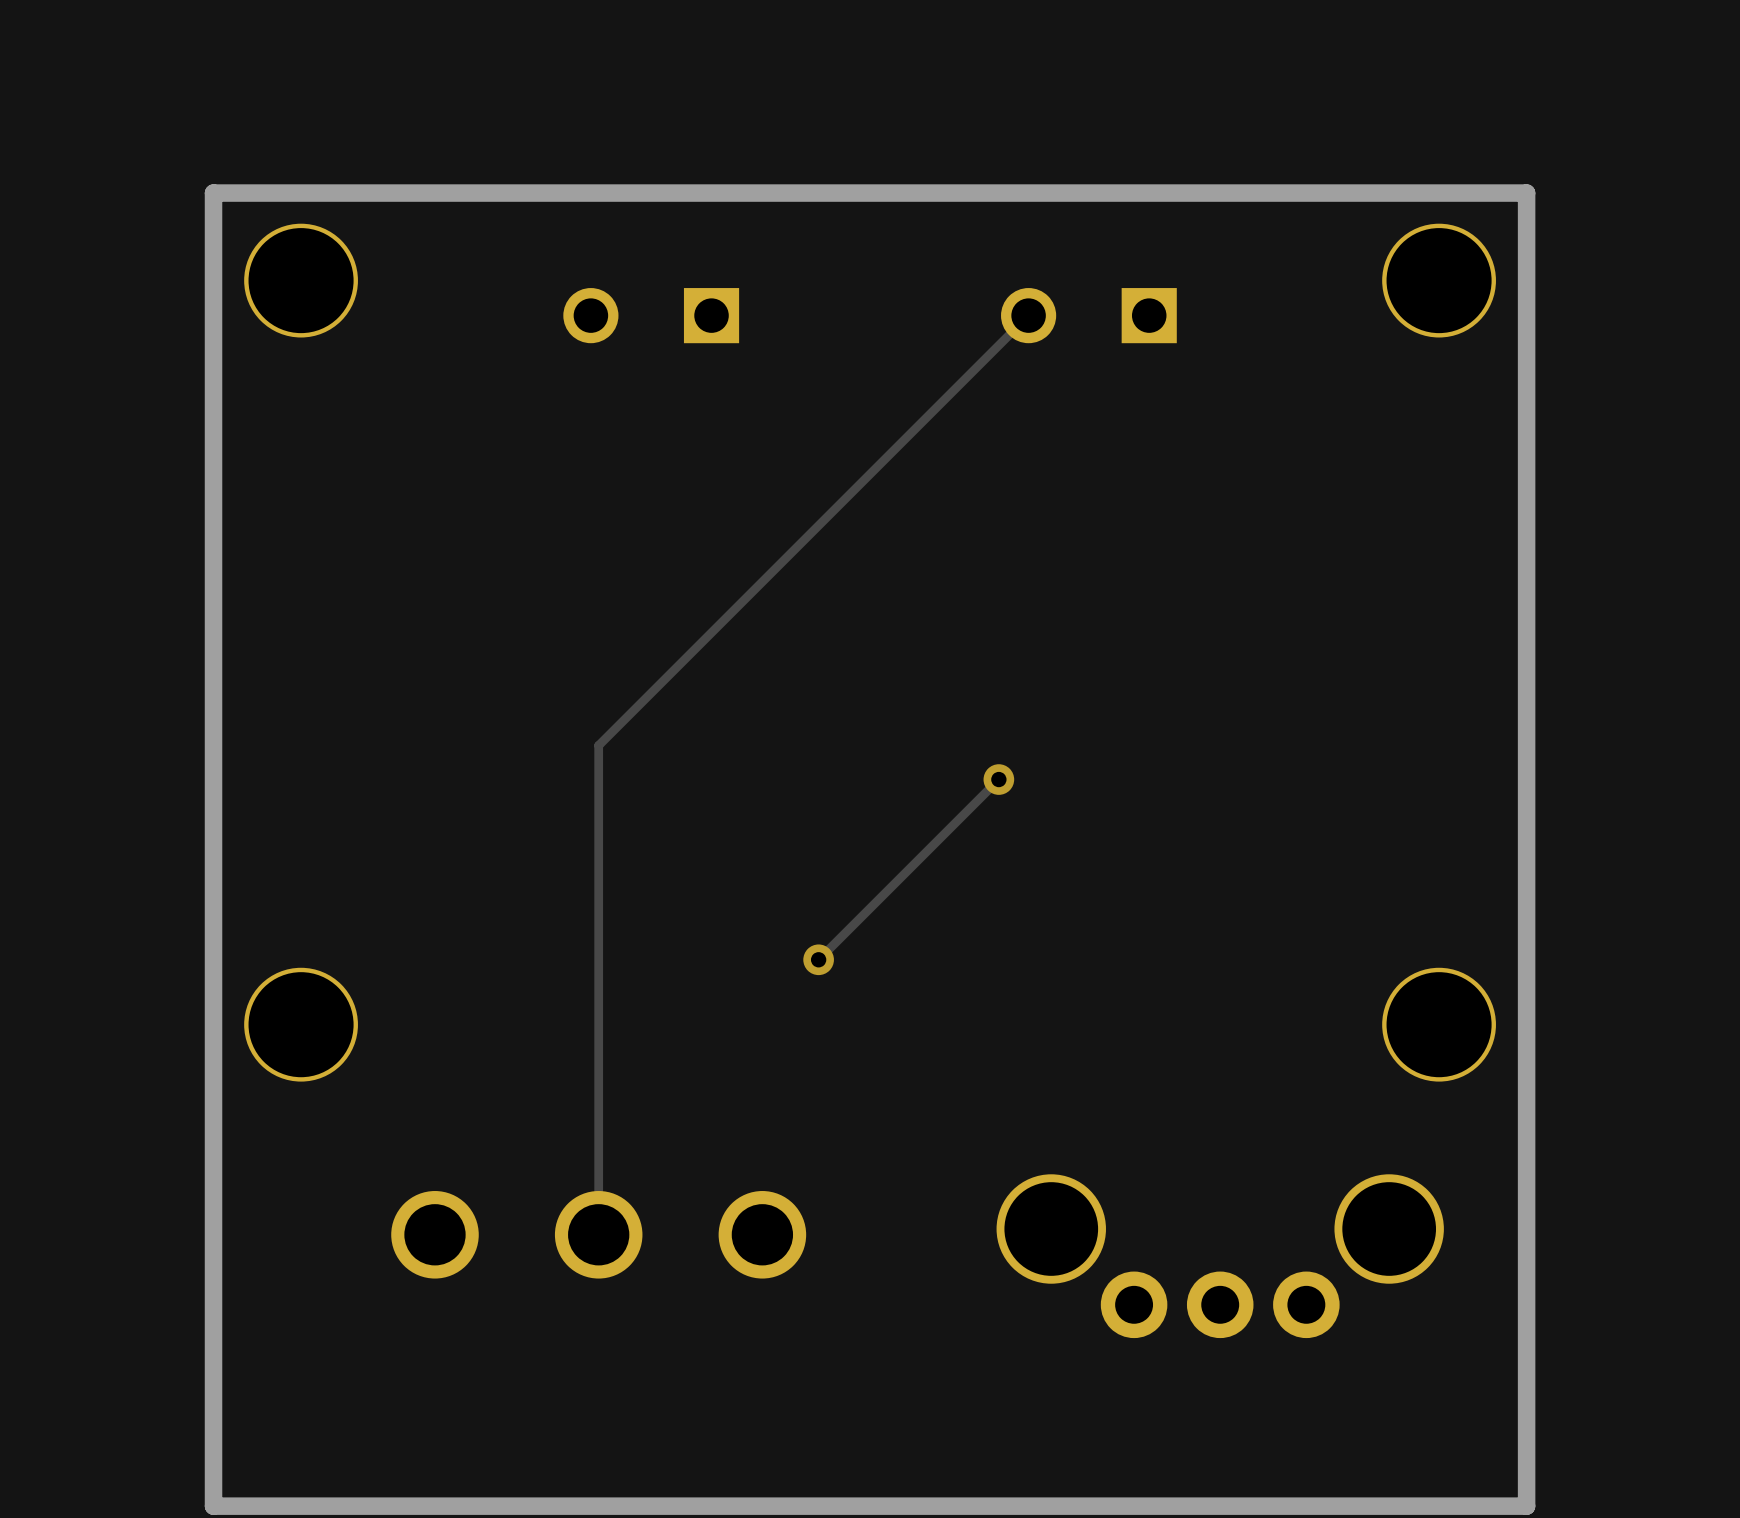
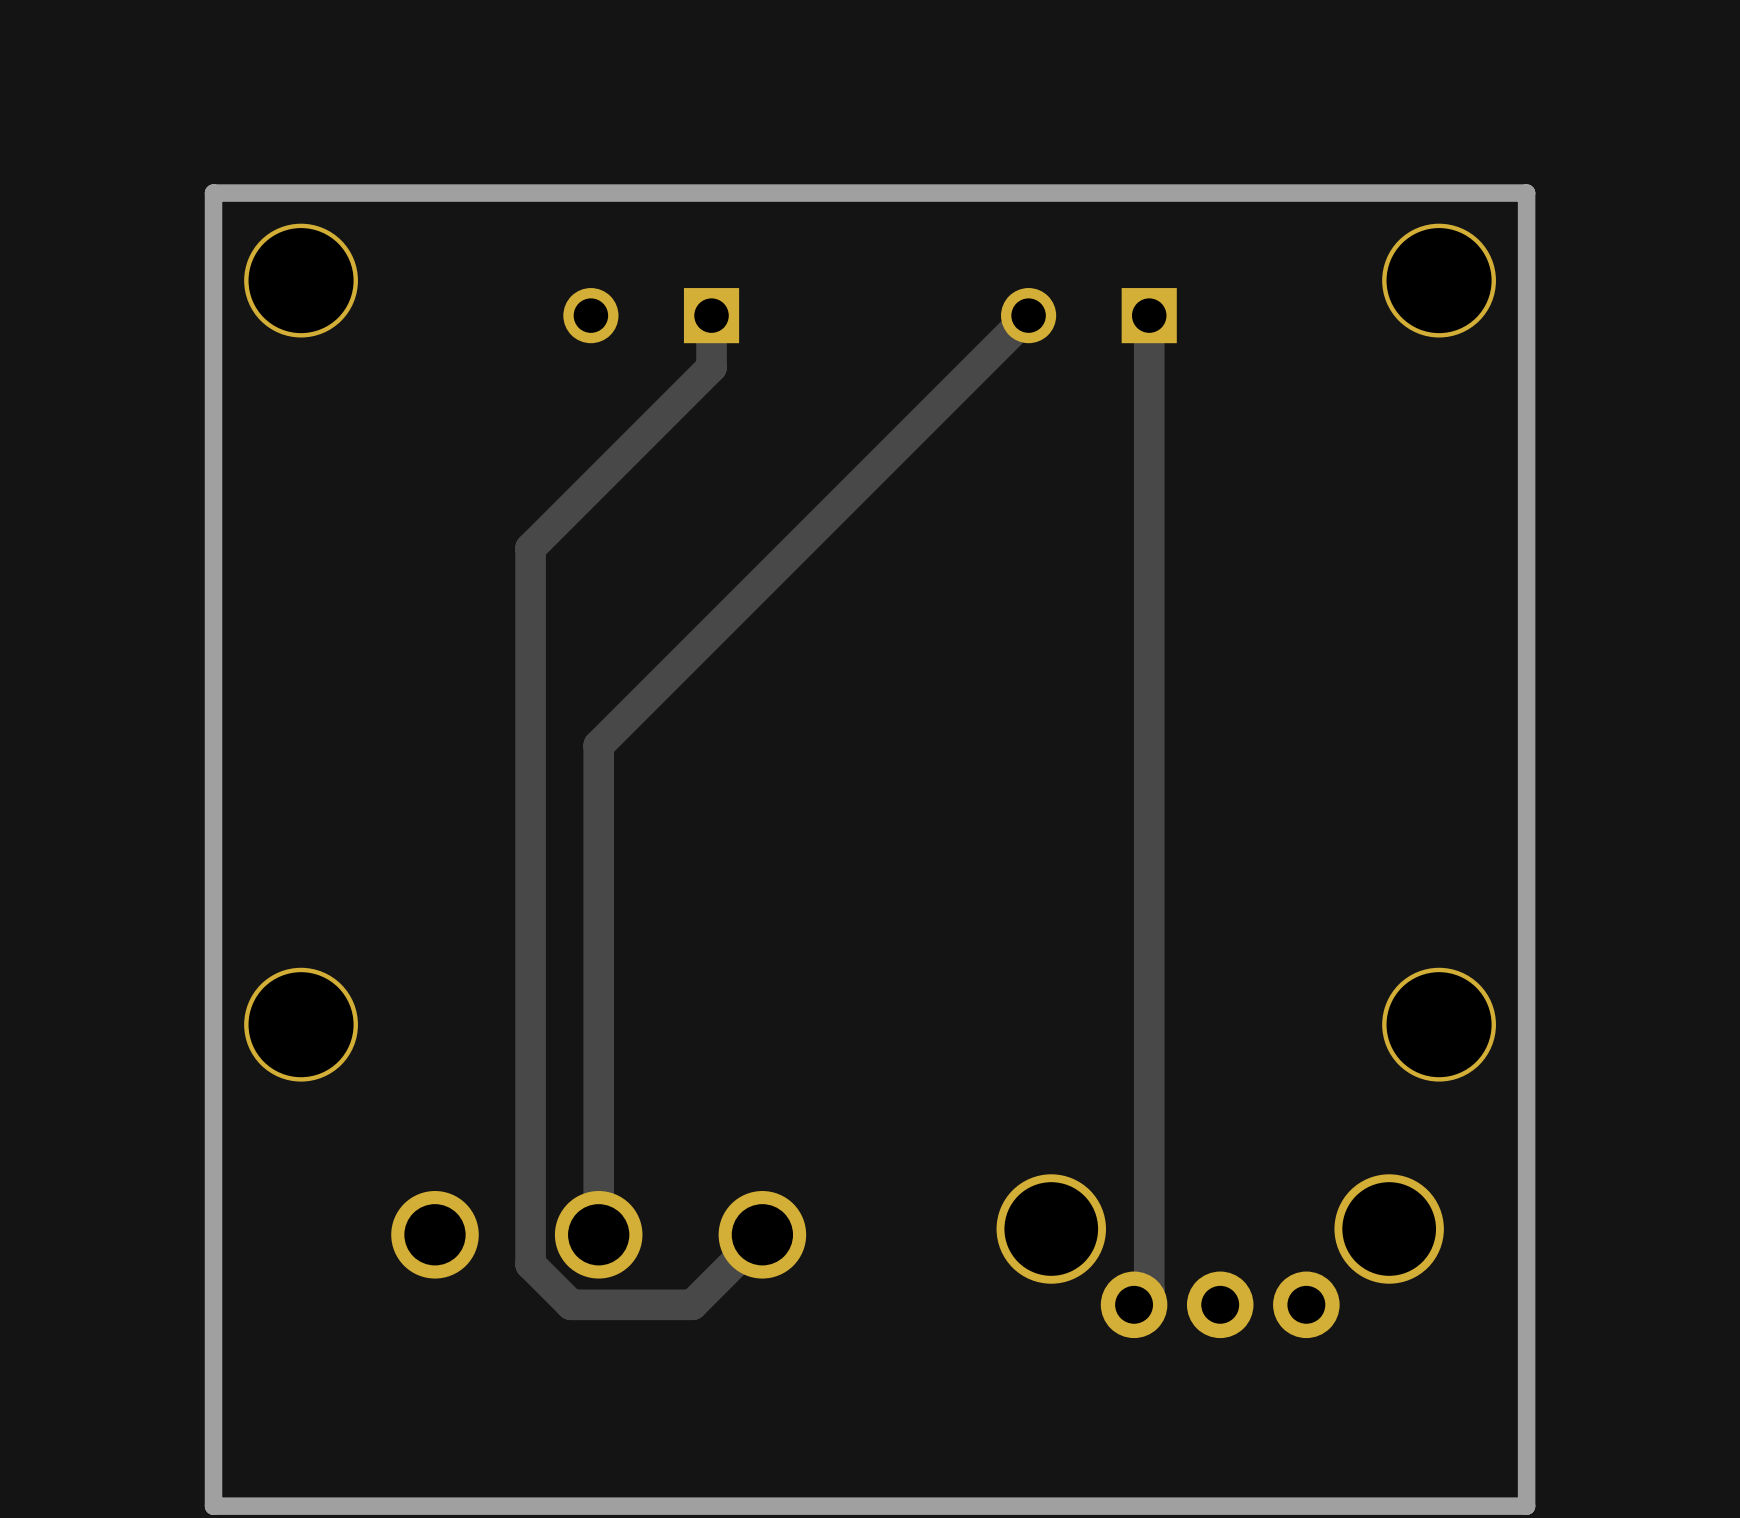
track: none -> (711, 315) (711, 367) (530, 548) (530, 1264) (571, 1304) (692, 1304) (762, 1234)
track width: thin (1028, 315) (598, 745) (598, 1234) -> thick (1028, 315) (598, 745) (598, 1234)
track: none -> (1149, 315) (1149, 1289) (1134, 1304)
track: (998, 779) (818, 959) -> none
via: (998, 779) -> none
via: (818, 959) -> none

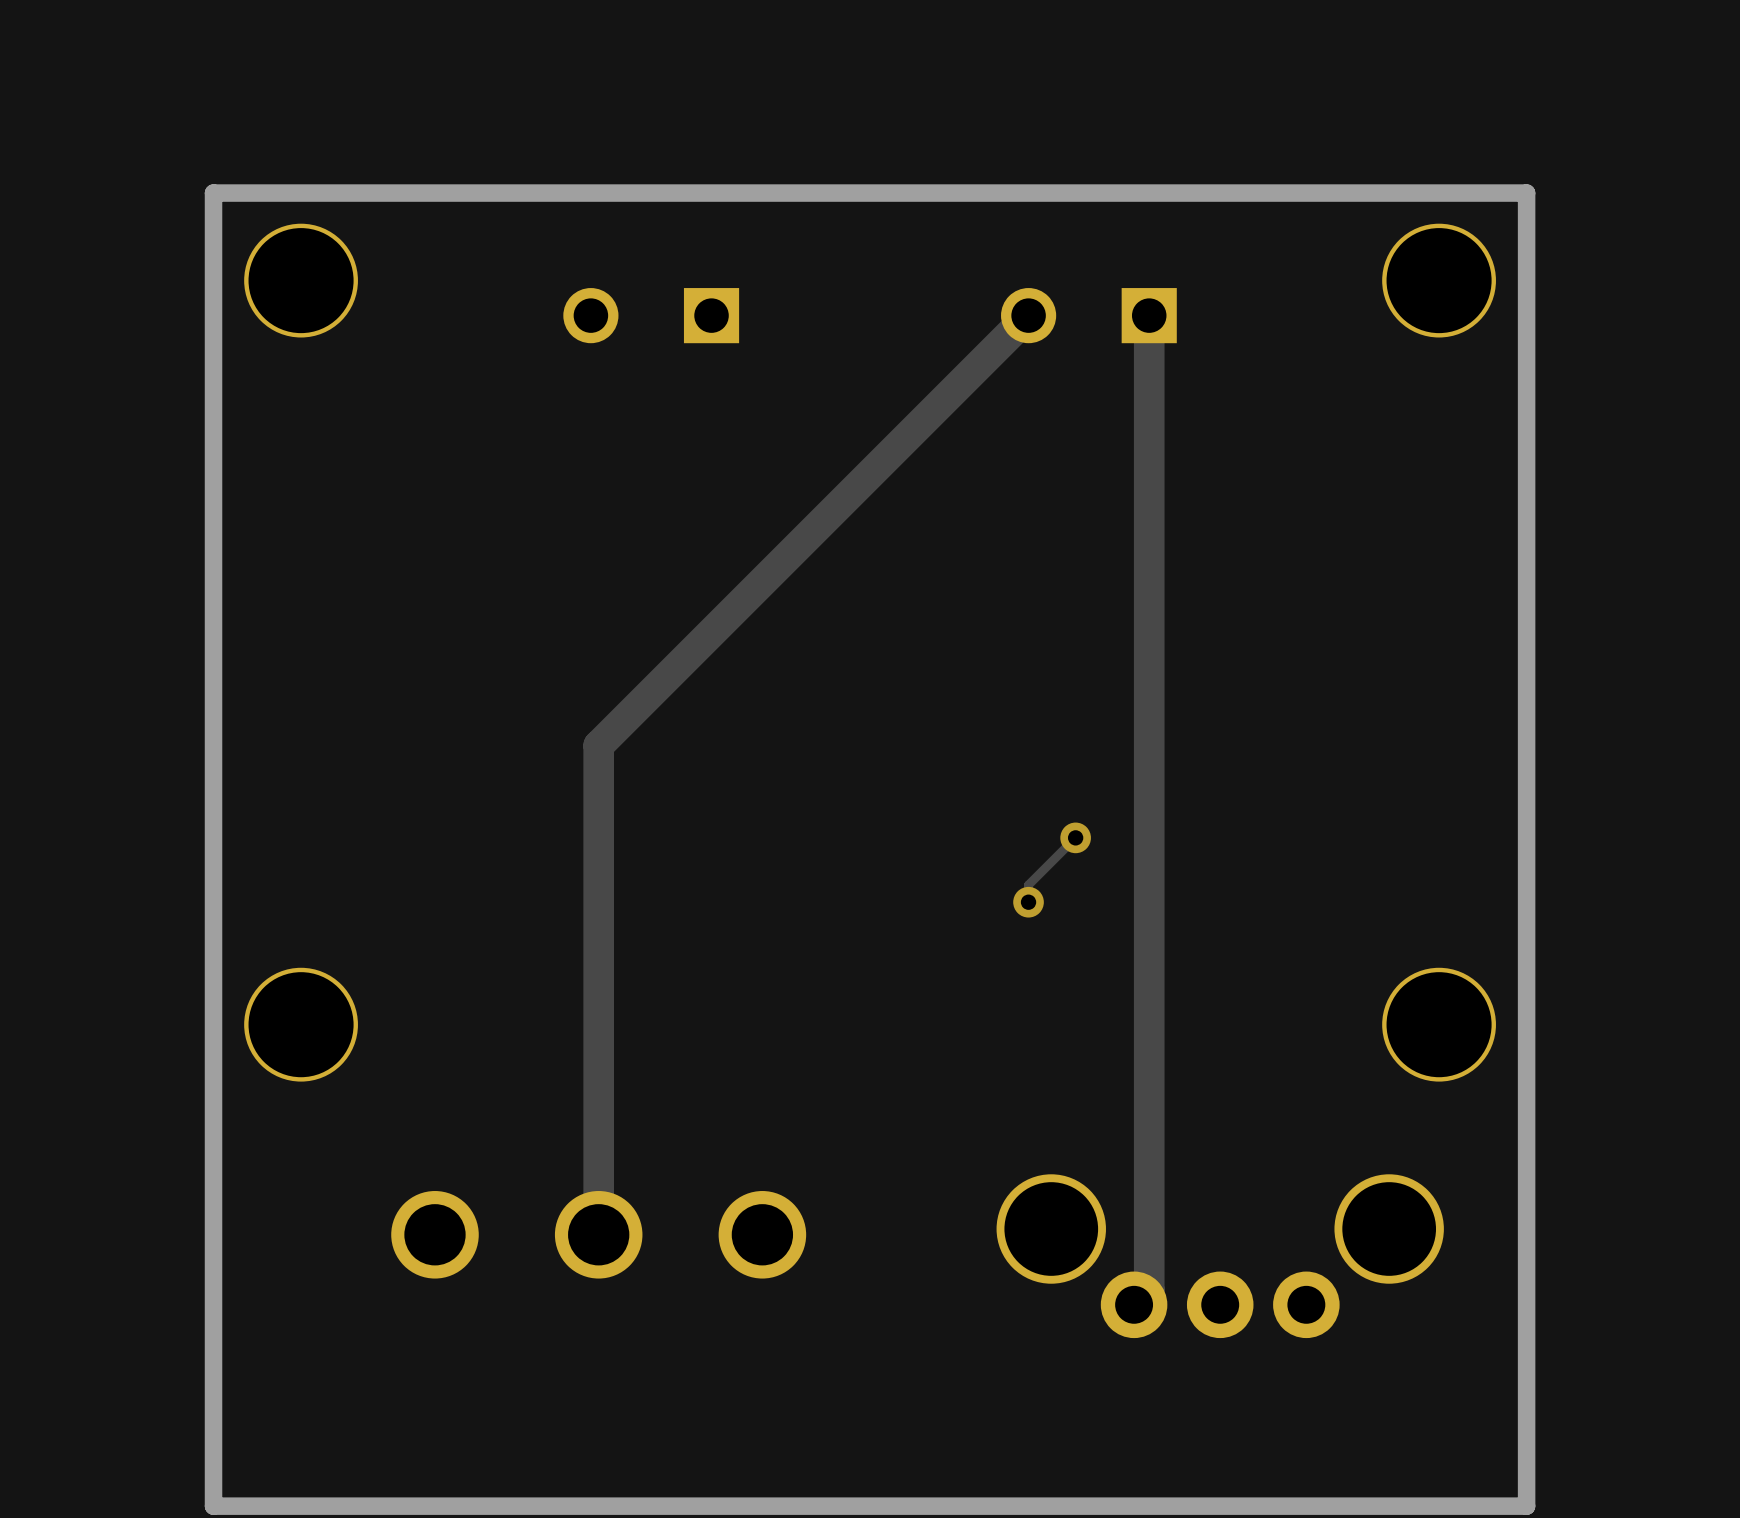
track: (711, 315) (711, 367) (530, 548) (530, 1264) (571, 1304) (692, 1304) (762, 1234) -> none
track: none -> (1075, 837) (1028, 884) (1028, 902)
via: none -> (1075, 837)
via: none -> (1028, 902)

